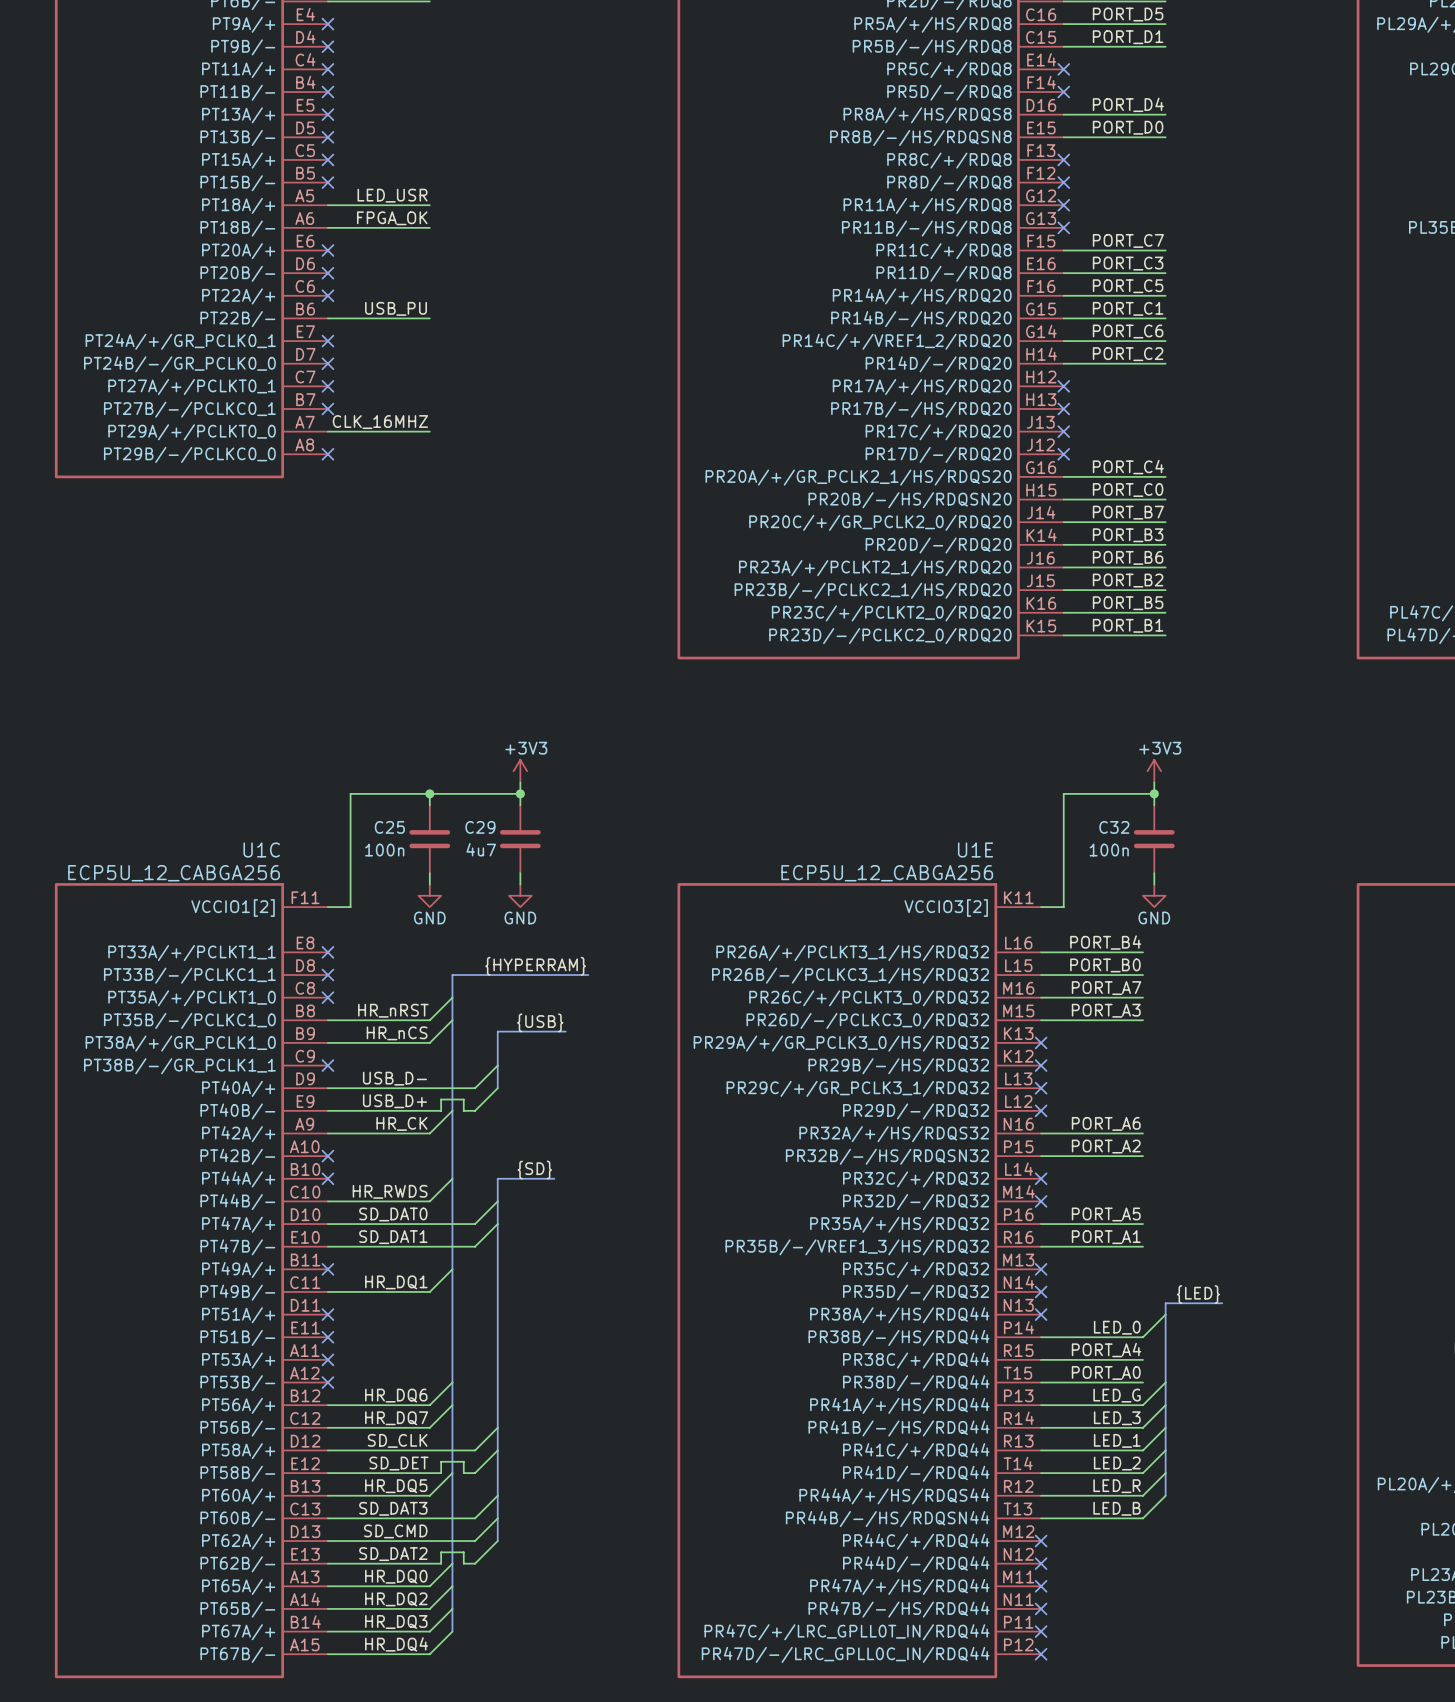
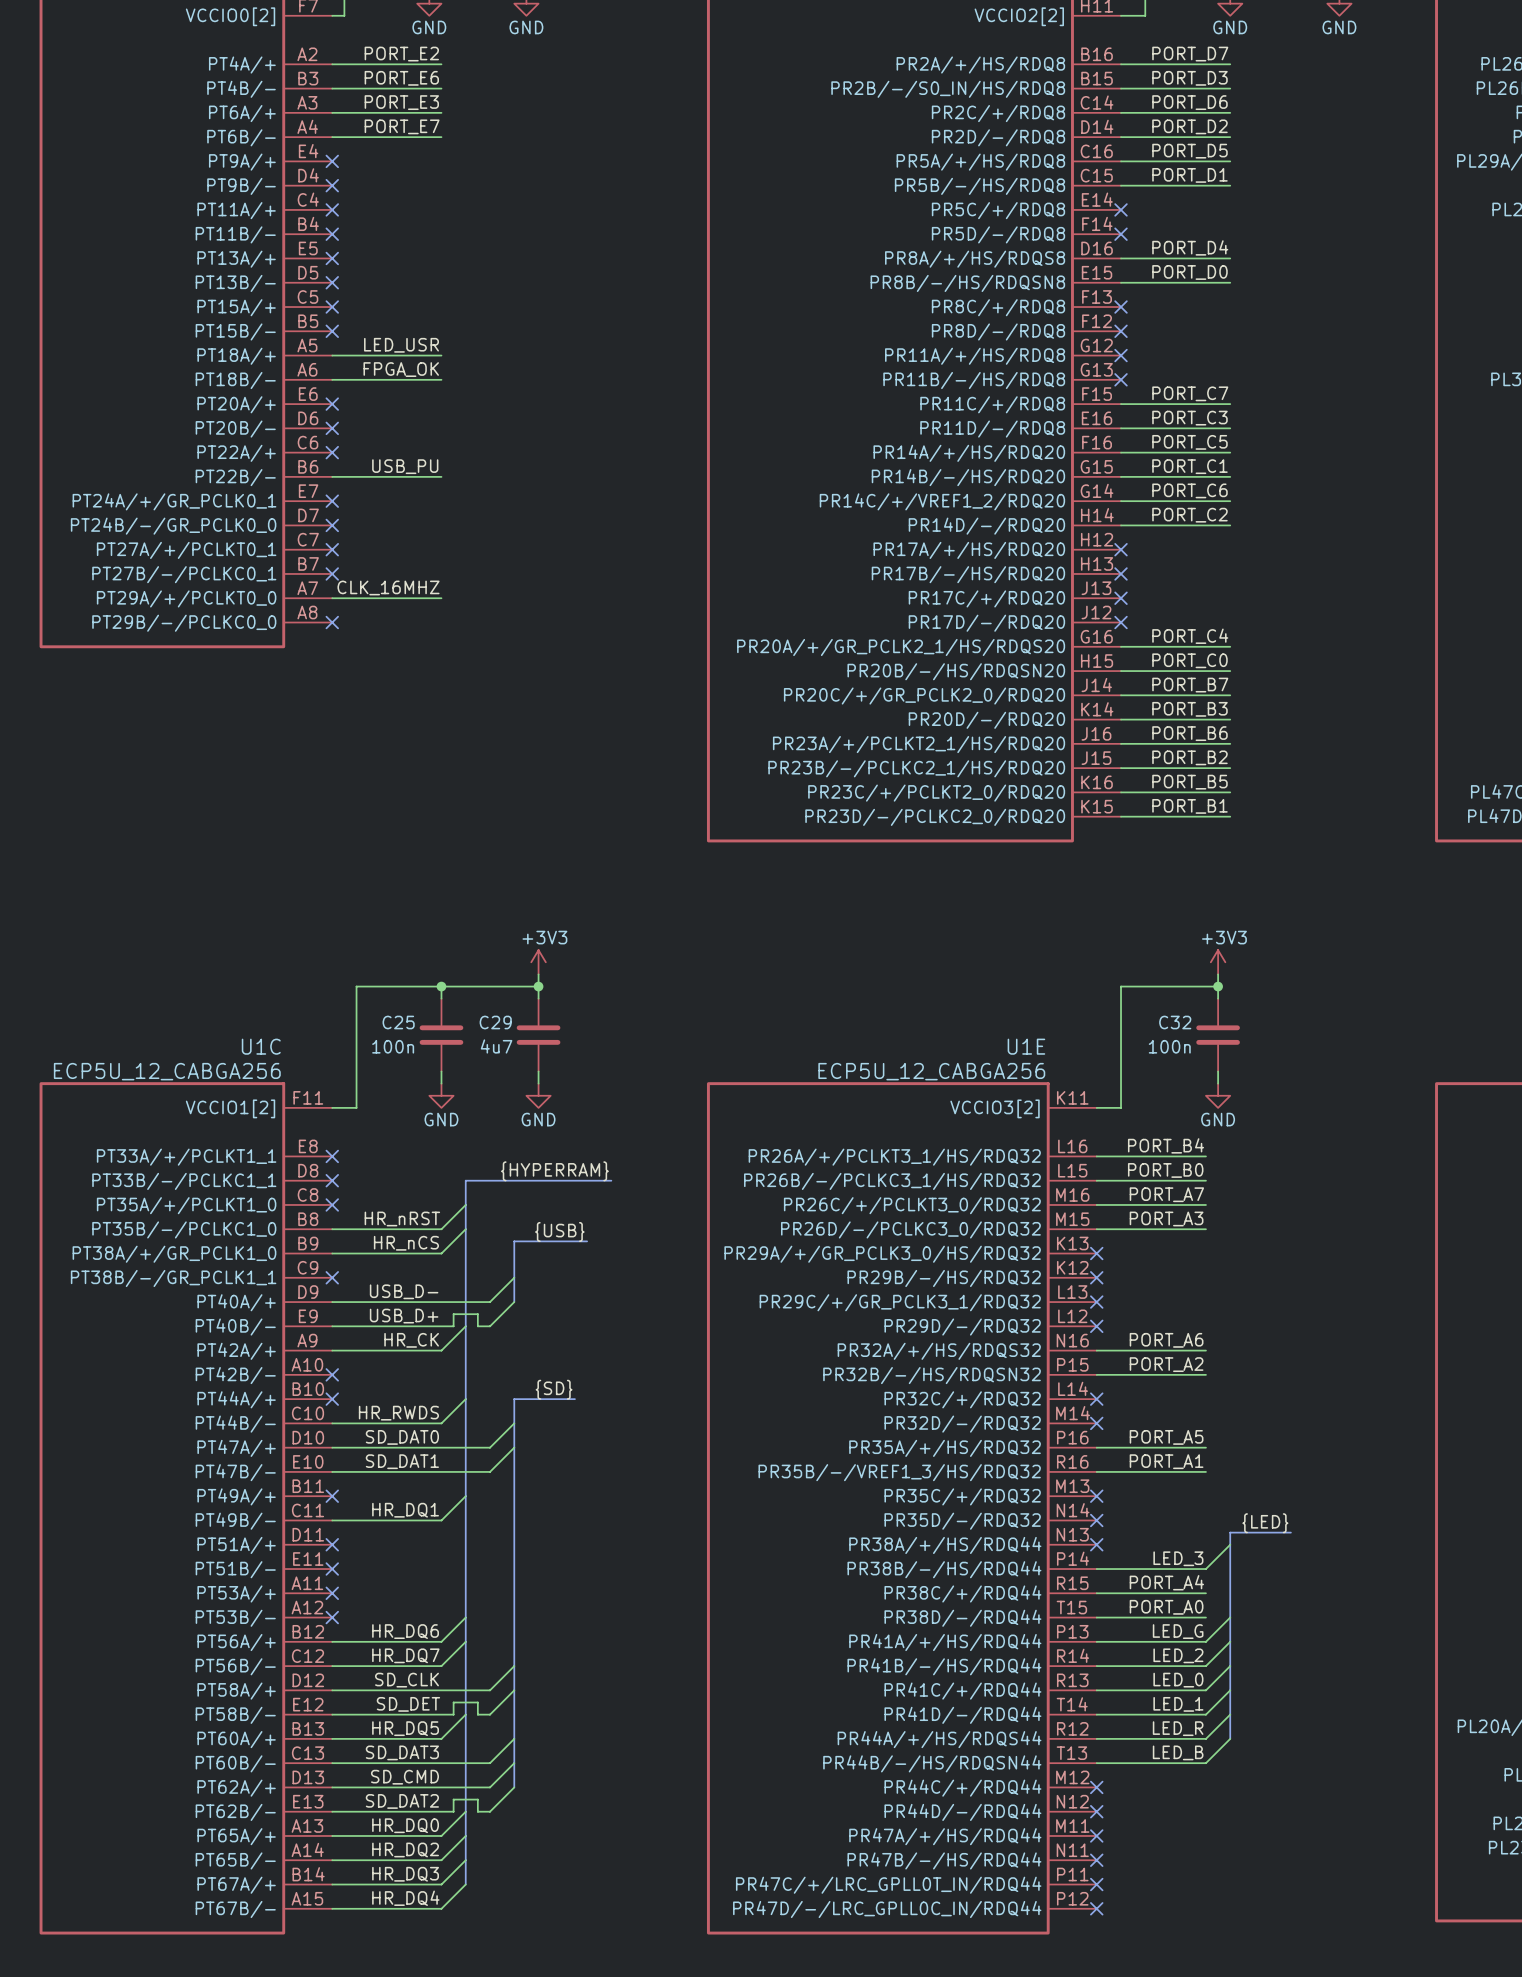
label: LED_0 (1117, 1327) -> LED_3 (1178, 1558)
label: LED_3 (1117, 1418) -> LED_2 (1178, 1655)
label: LED_1 (1117, 1440) -> LED_0 (1178, 1680)
label: LED_2 (1117, 1463) -> LED_1 (1178, 1704)

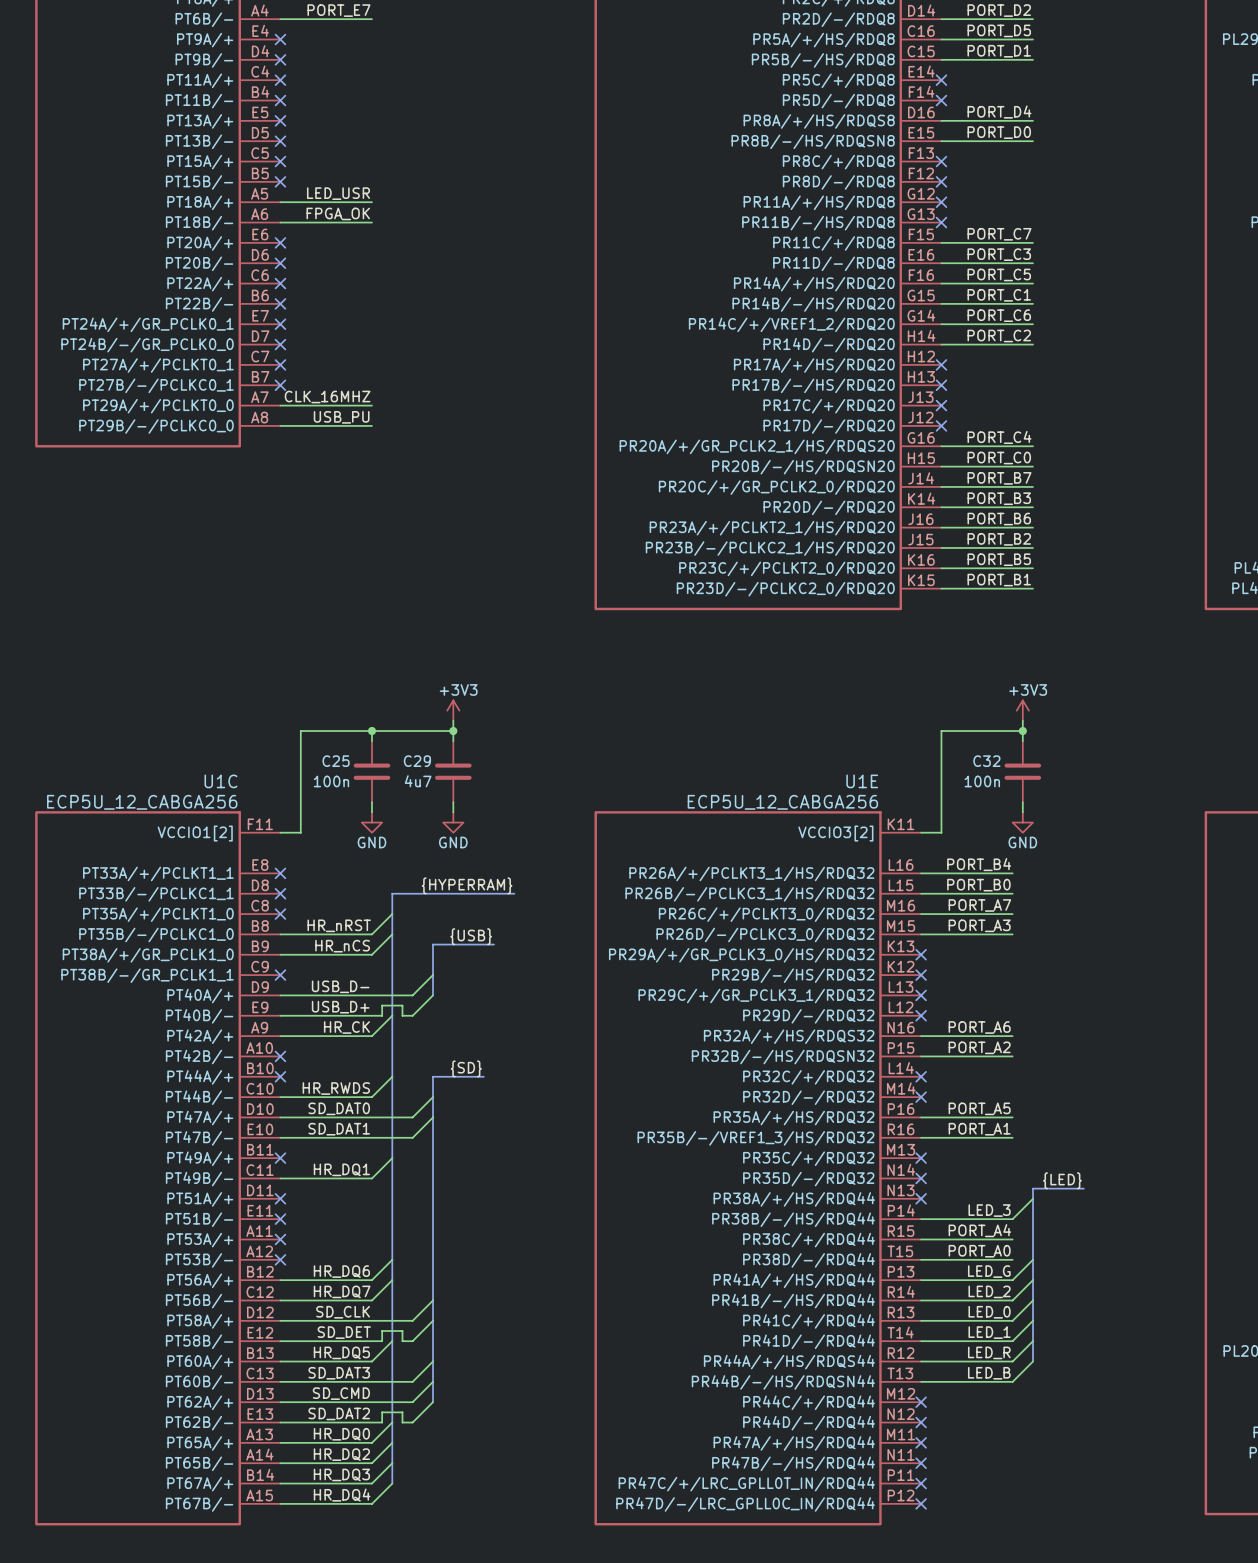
label position: USB_PU (405, 466) -> USB_PU (341, 417)
wire: (332, 476) (441, 476) -> (280, 425) (371, 425)
no-connect mark: none -> (280, 303)
no-connect mark: (332, 622) -> none

